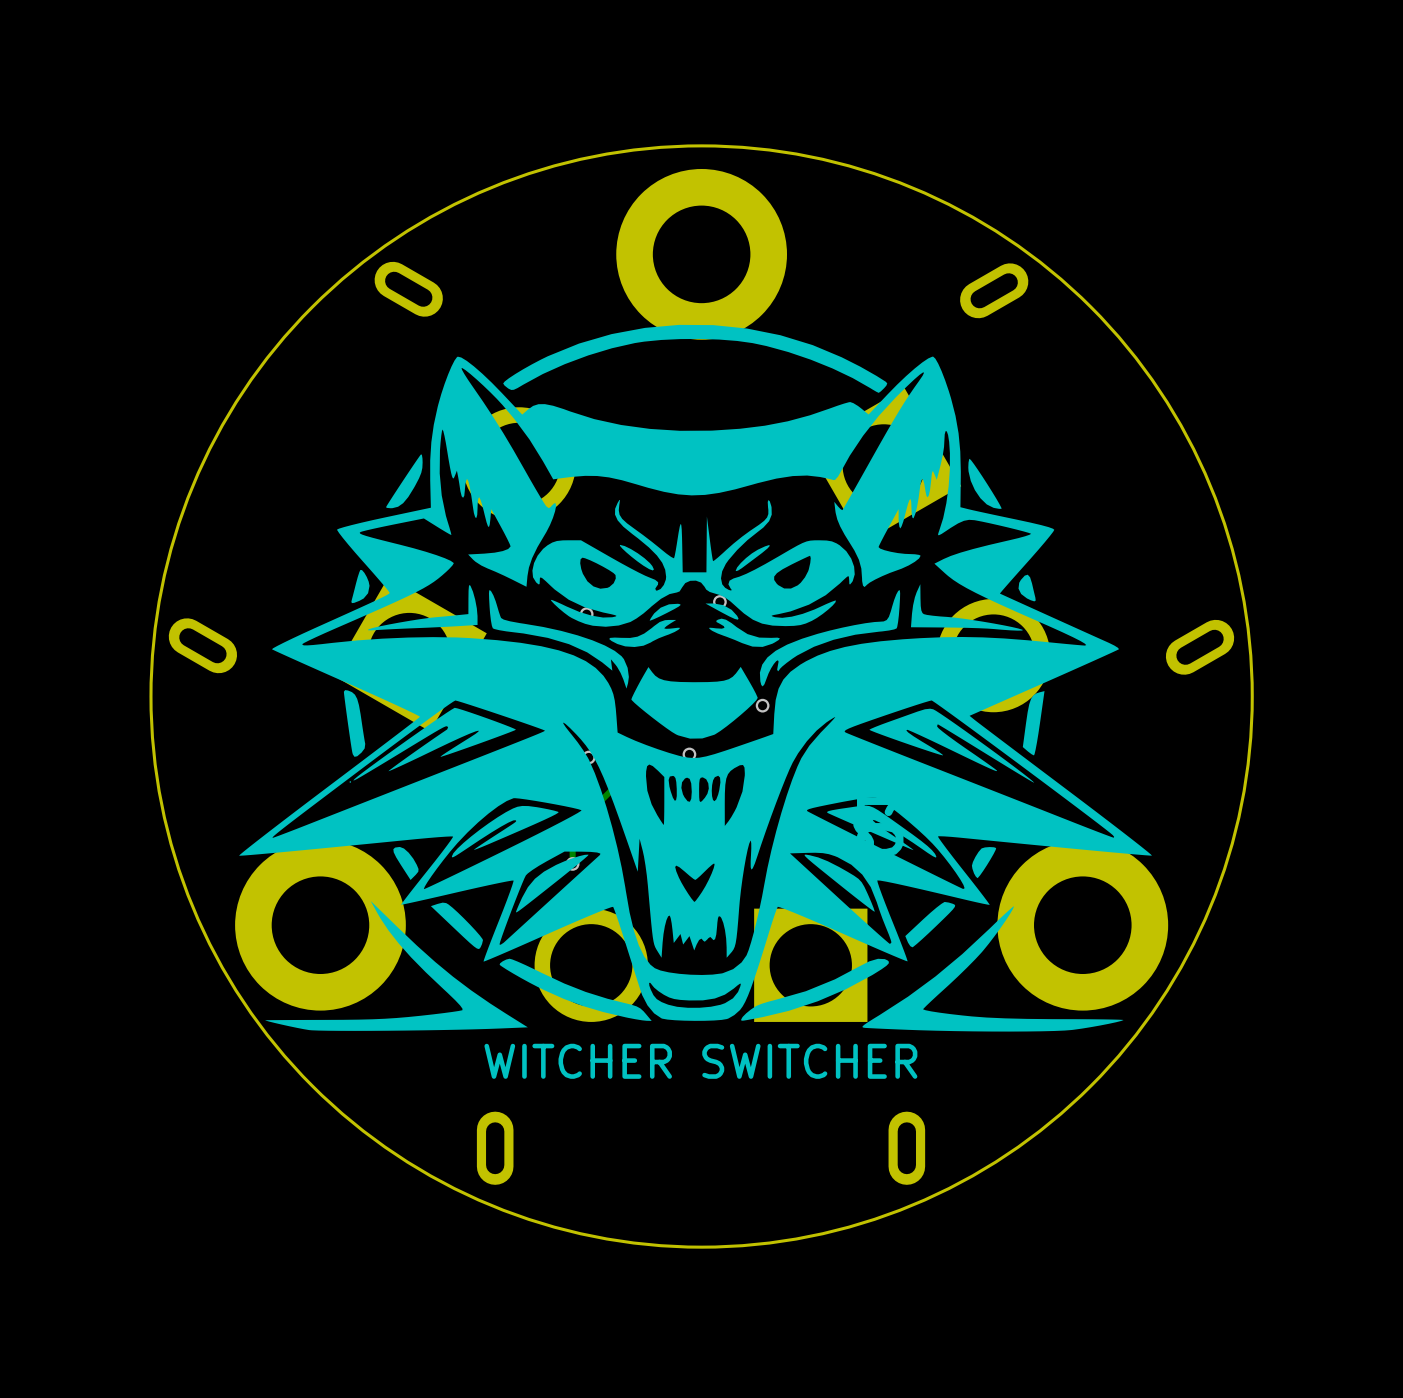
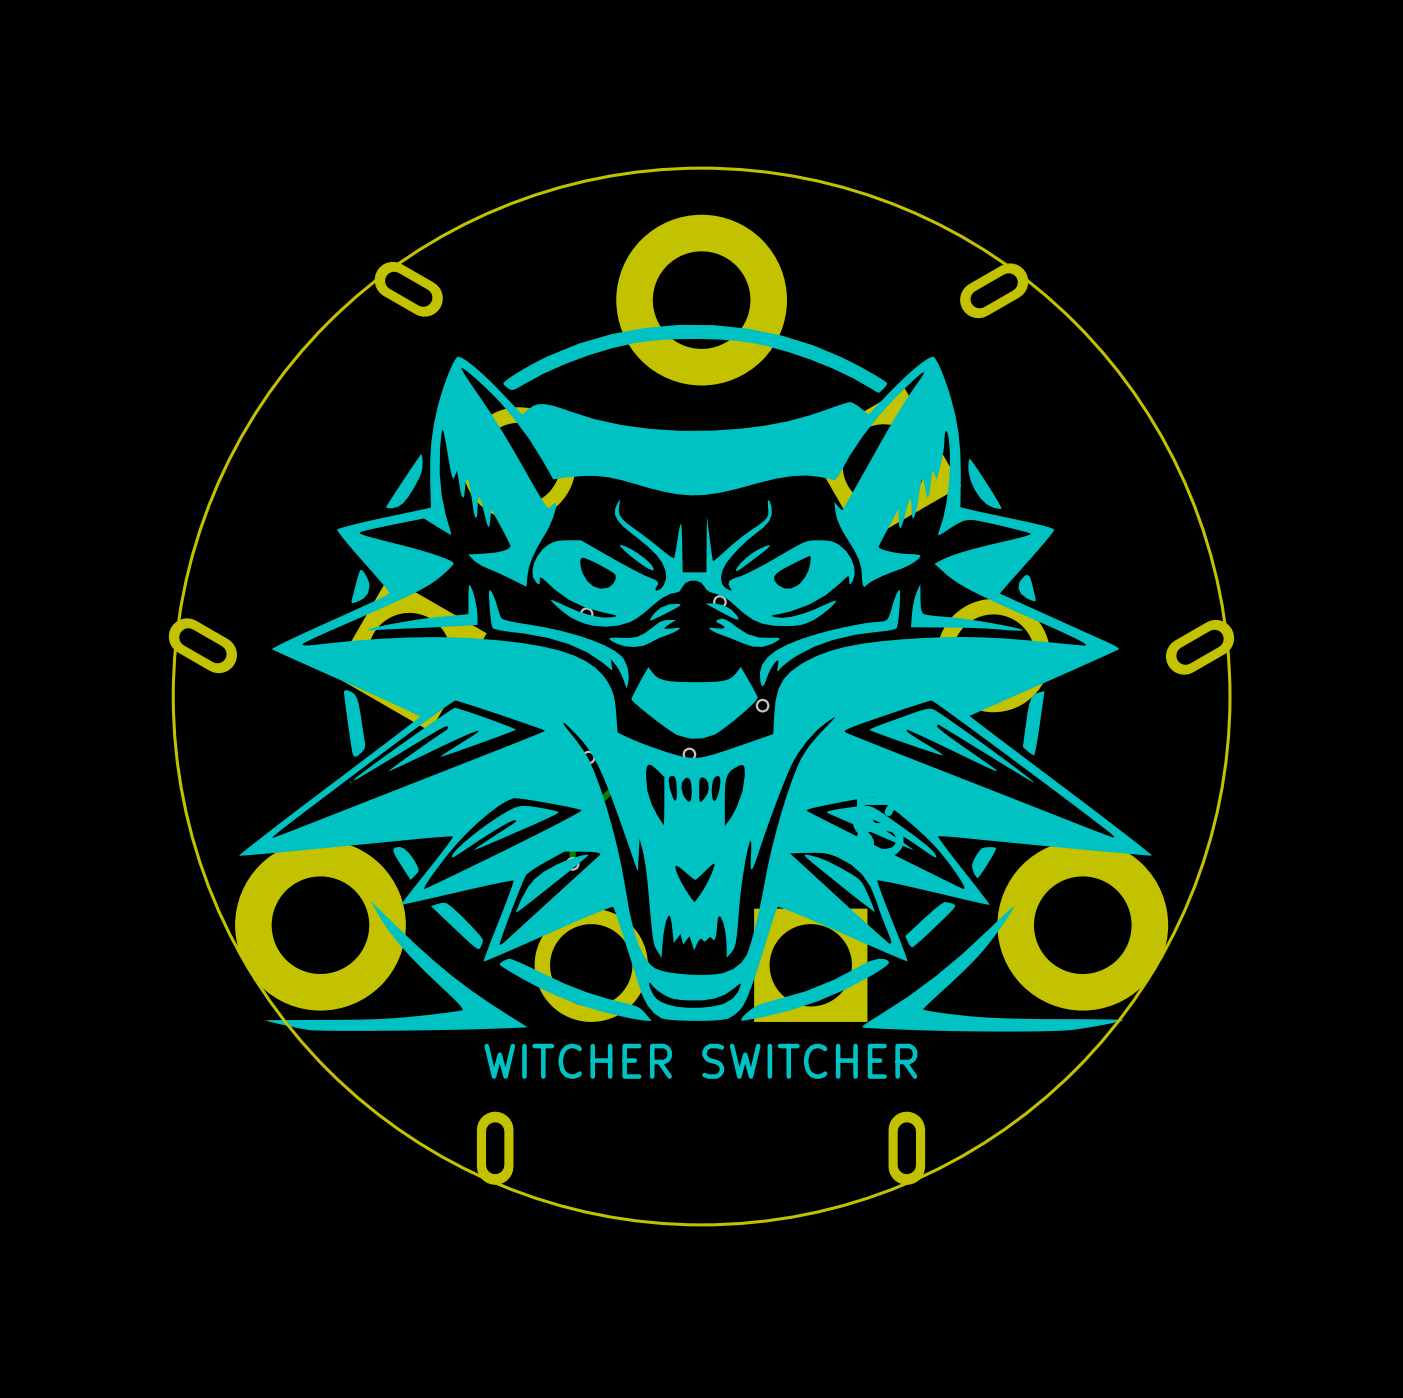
round board edge size: [149, 144, 1254, 1249] -> [171, 166, 1232, 1227]
part position: (701, 254) -> (701, 300)

